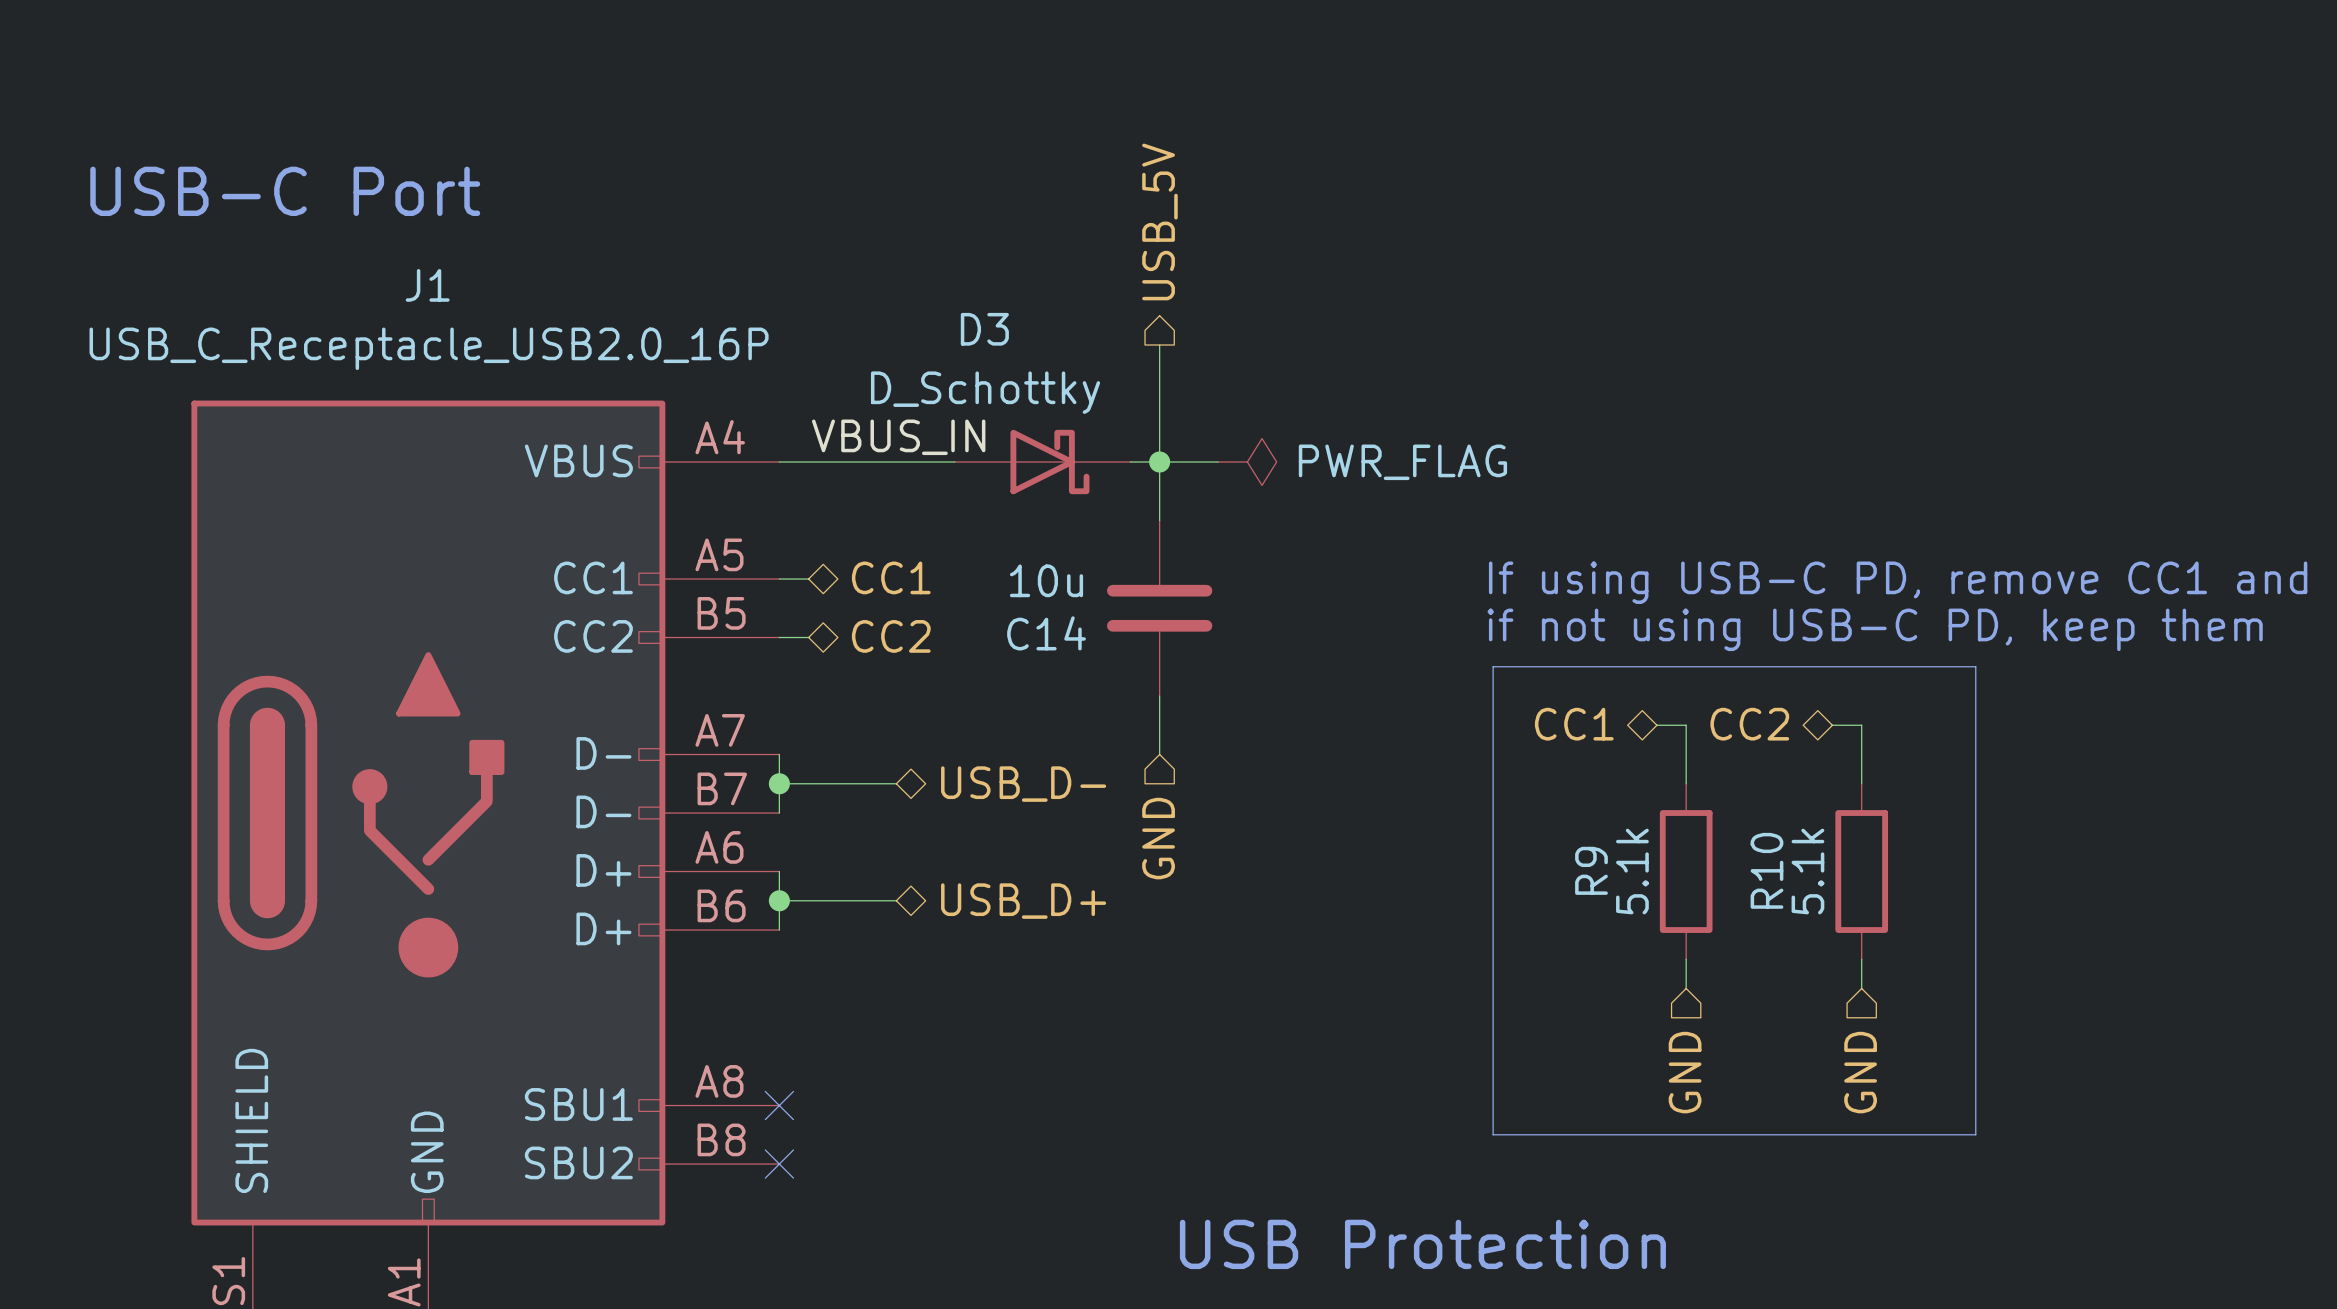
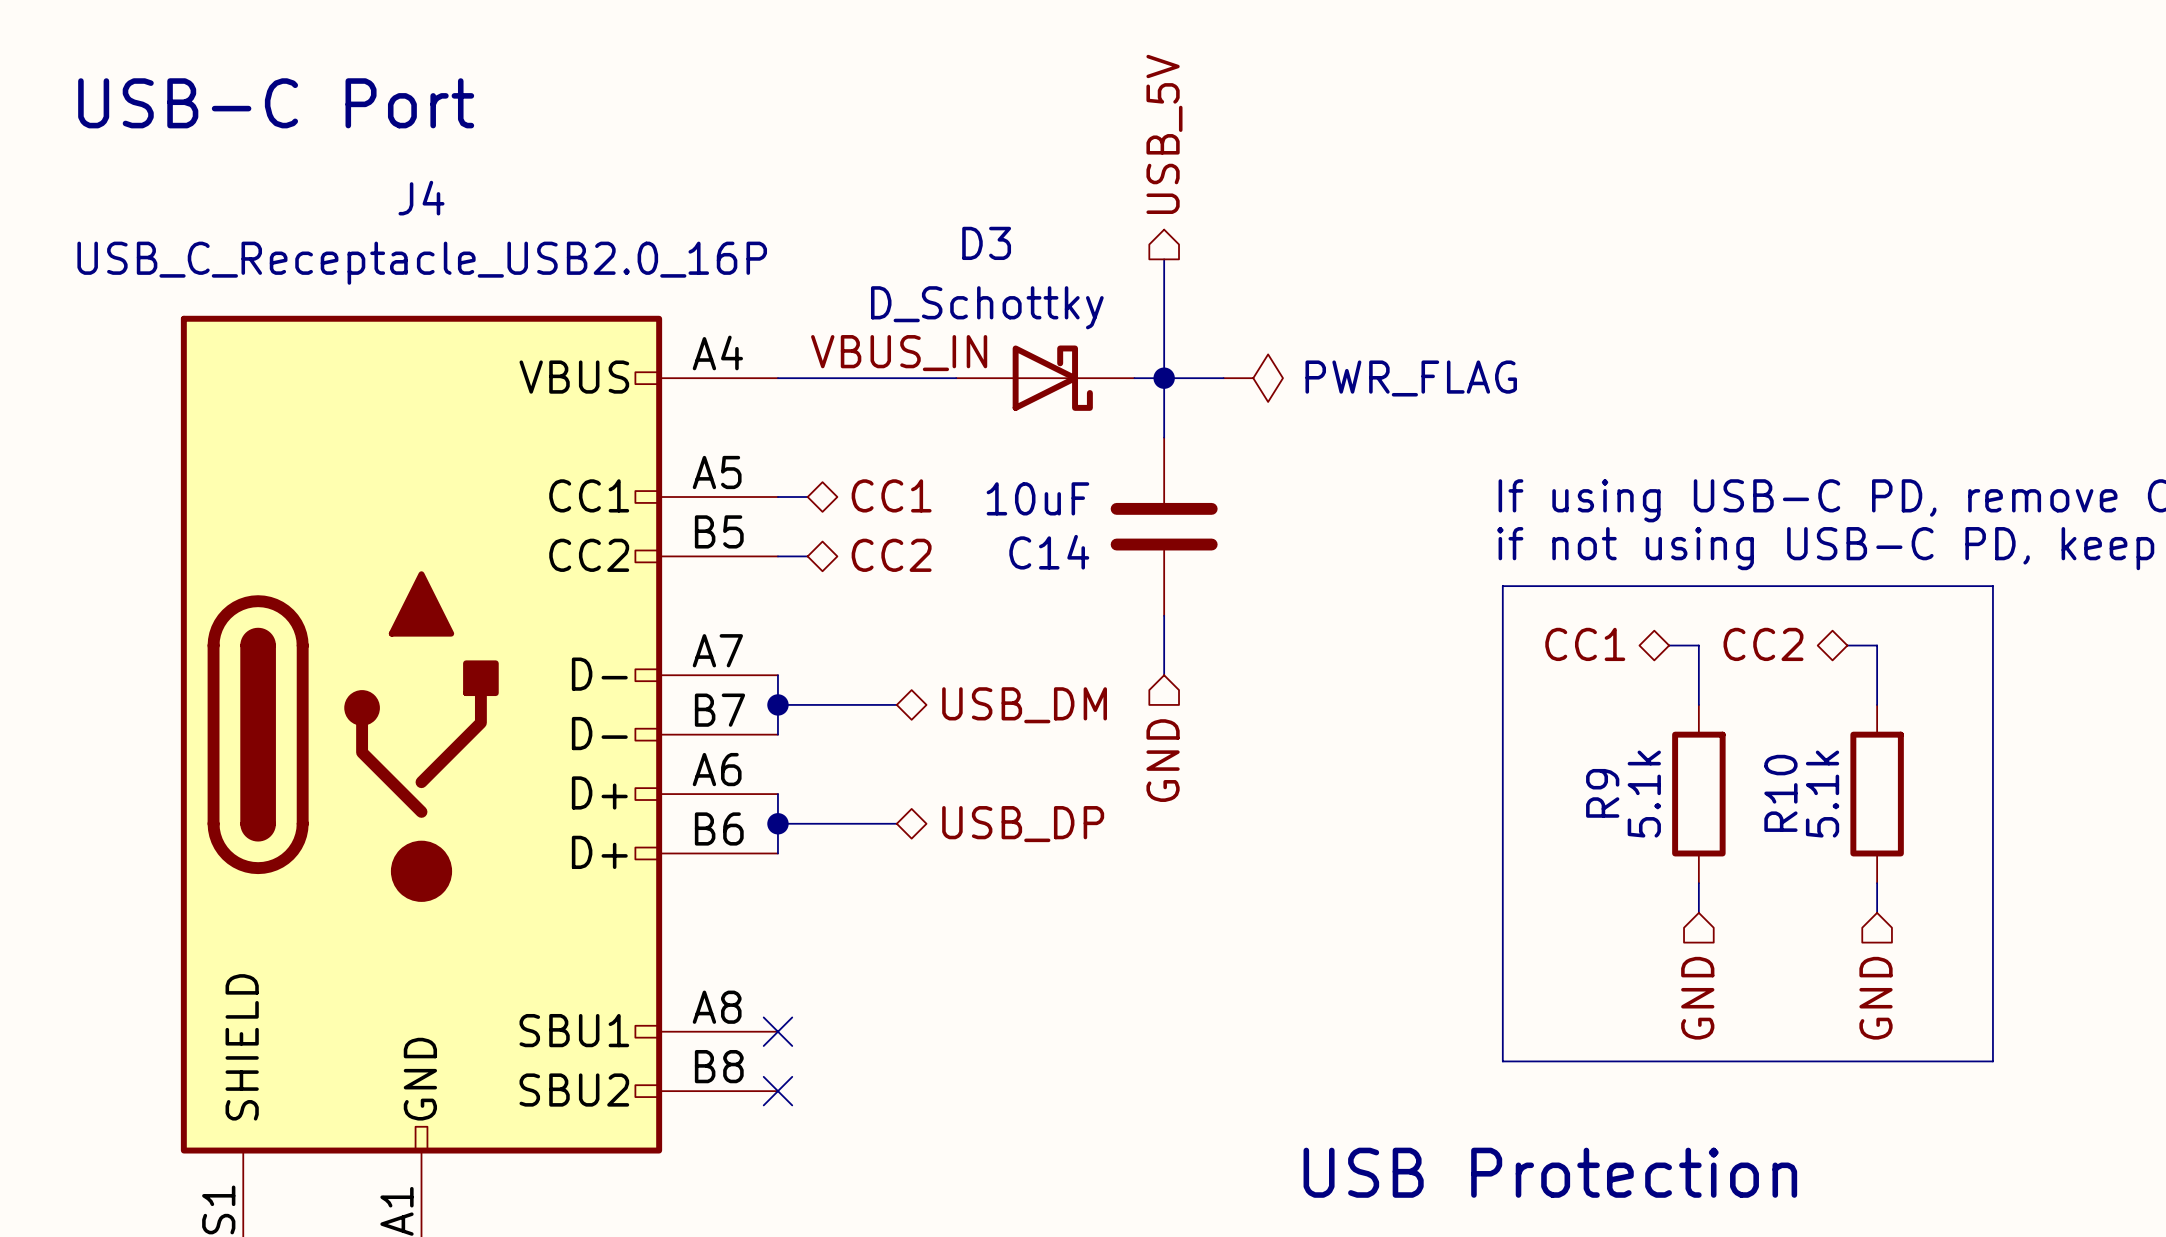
J1 name: J1 (427, 285) -> J4 (421, 198)
C14 value: 10u (1046, 580) -> 10uF (1037, 498)
hierarchical label: USB_D- (1023, 784) -> USB_DM (1024, 705)
hierarchical label: USB_D+ (1023, 901) -> USB_DP (1023, 824)
text position: USB Protection (1422, 1244) -> USB Protection (1550, 1172)

